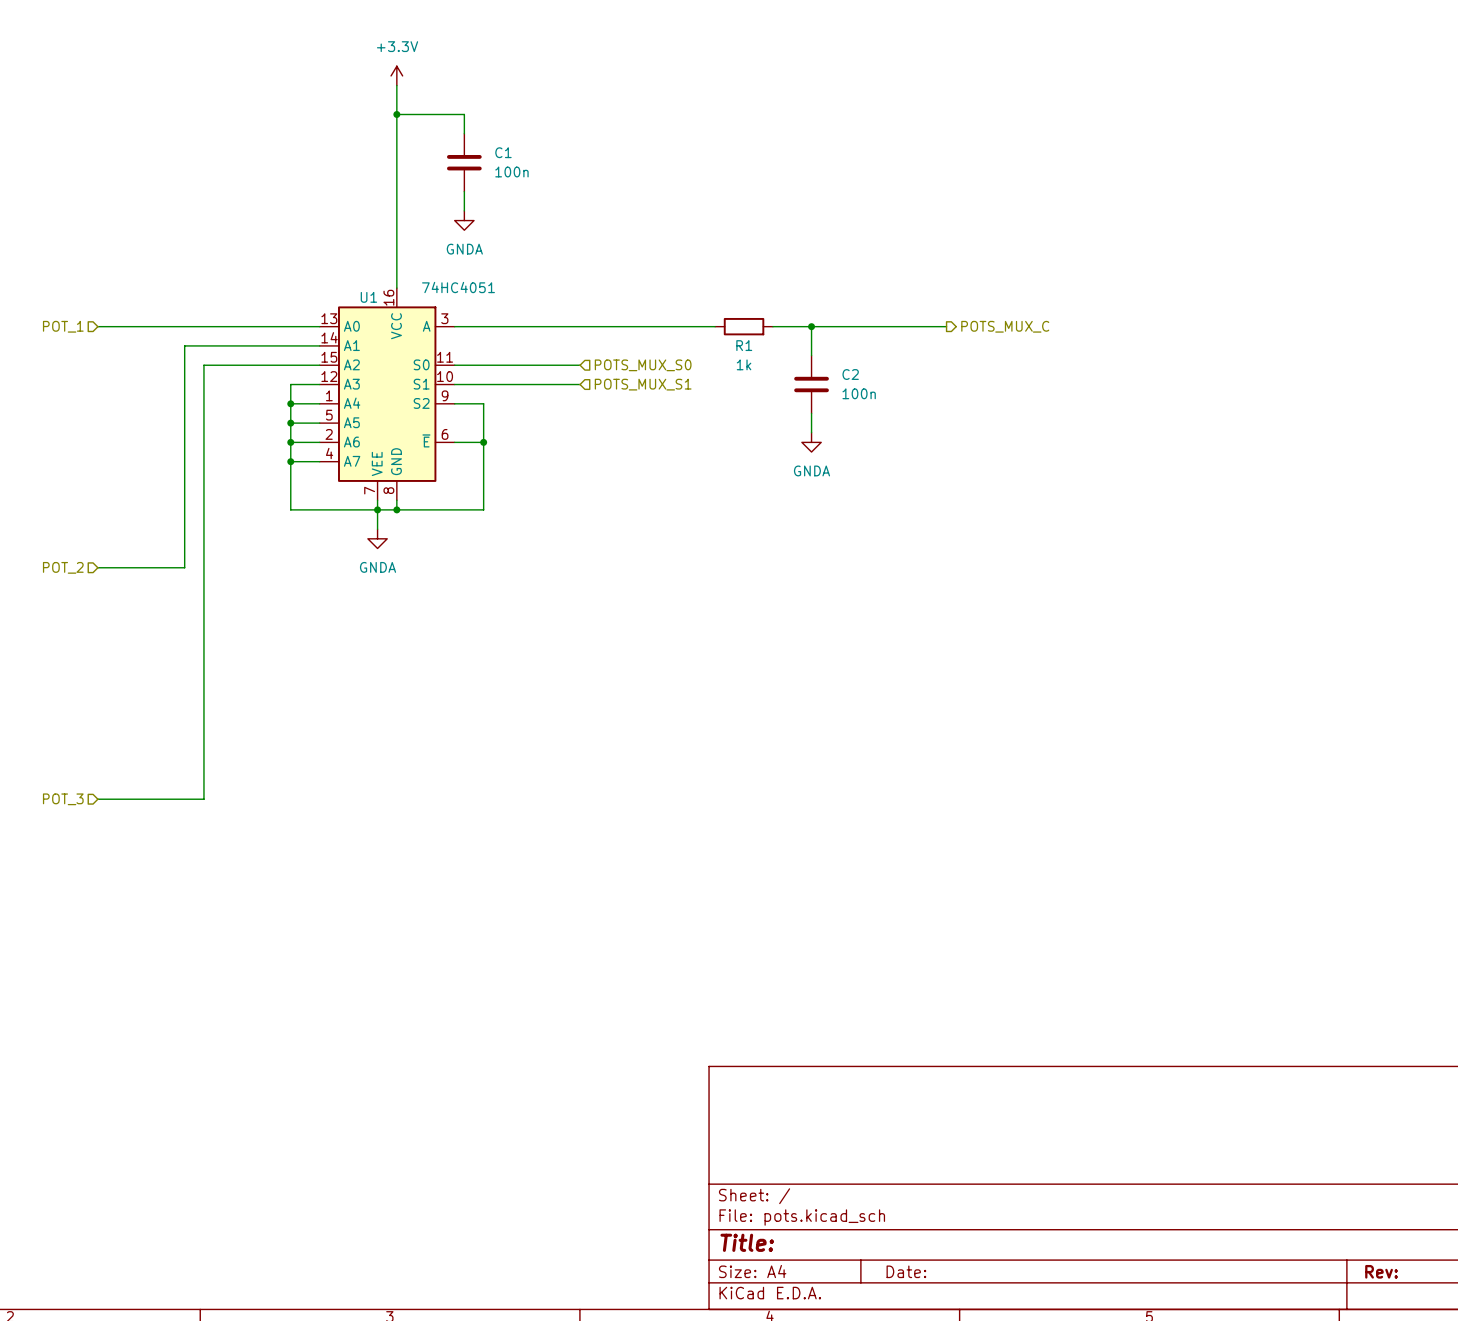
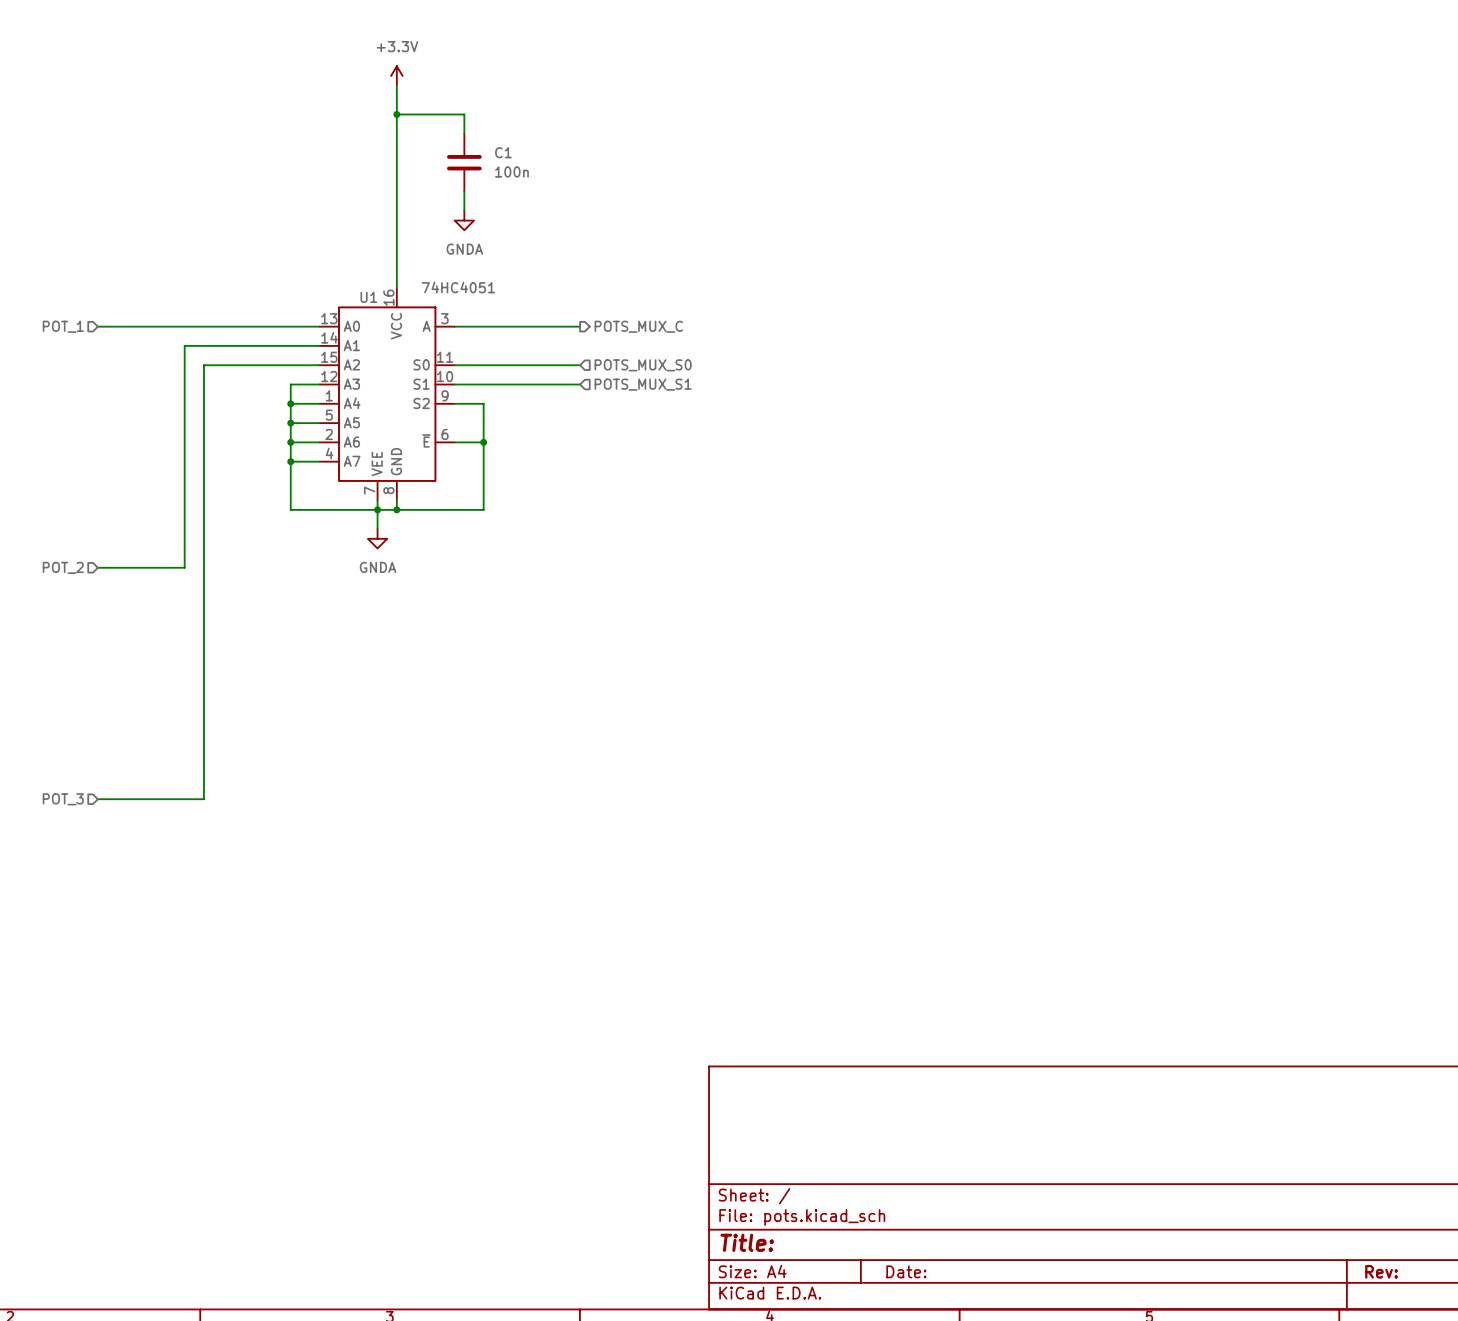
wire: (580, 326) (715, 326) -> none
hierarchical label: none -> POTS_MUX_C (638, 326)
R1: 1k (744, 326) -> none
wire: (772, 326) (946, 326) -> none
wire: (811, 326) (811, 355) -> none
junction: (811, 326) -> none
hierarchical label: POTS_MUX_C (1005, 326) -> none
C2: 100n (811, 384) -> none
wire: (811, 413) (811, 432) -> none
power symbol: GNDA (811, 442) -> none

